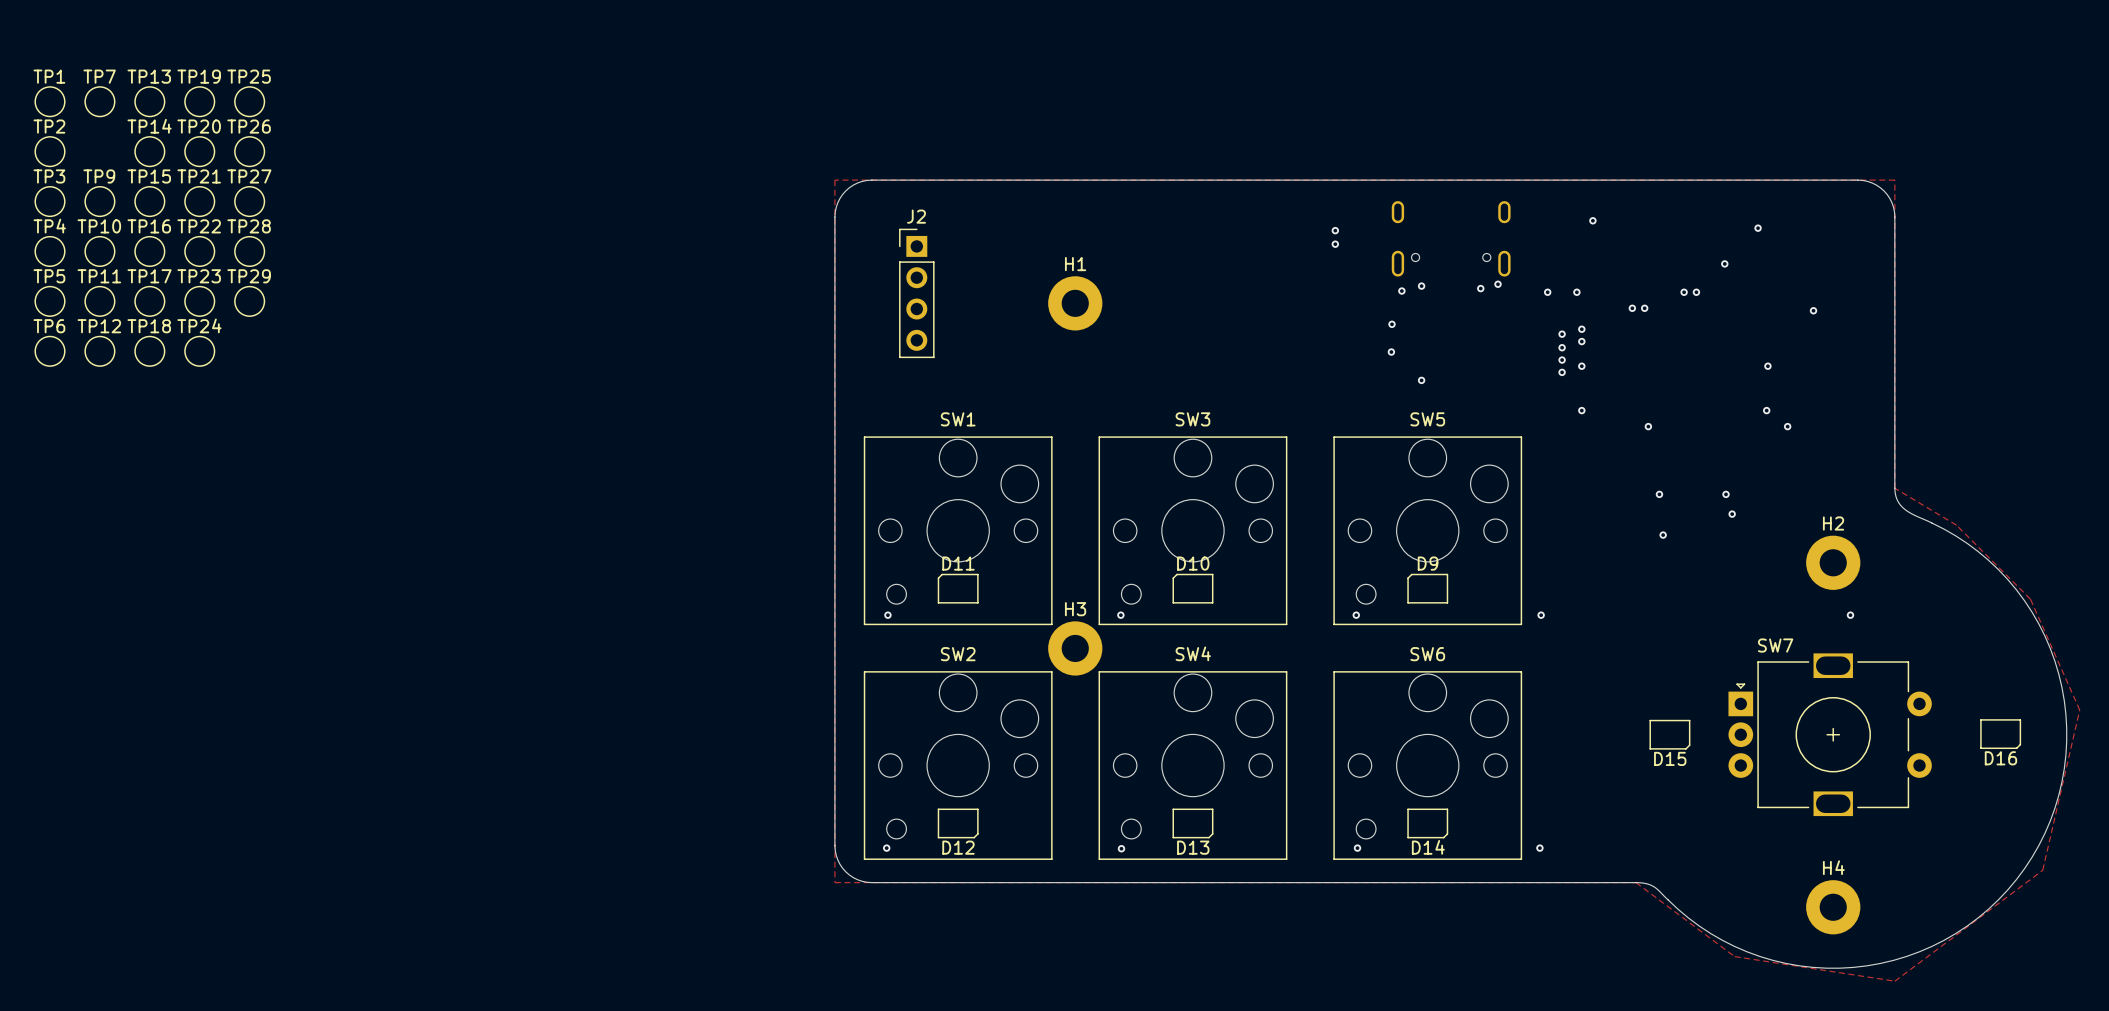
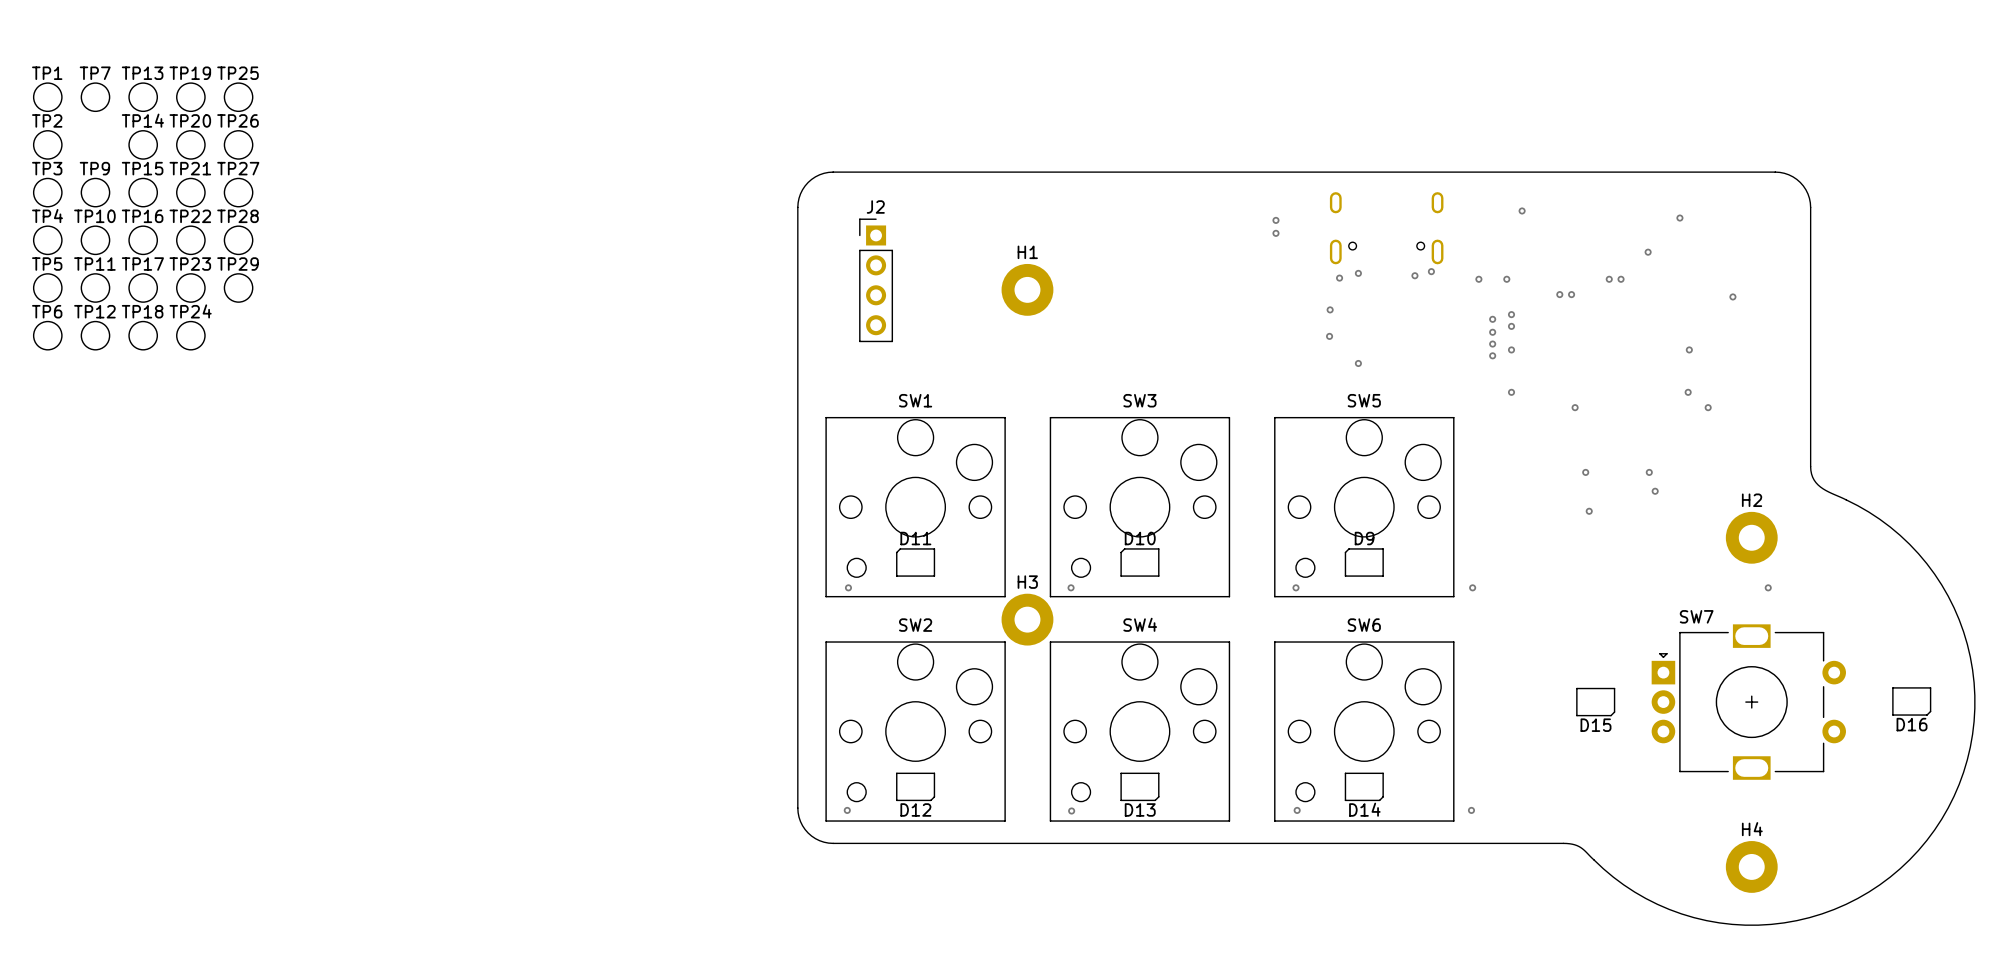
zone outline: (834, 180) (834, 882) (1636, 882) (1734, 956) (1894, 981) (2042, 870) (2079, 710) (2030, 599) (1956, 525) (1894, 488) (1894, 180) (834, 180) -> none

